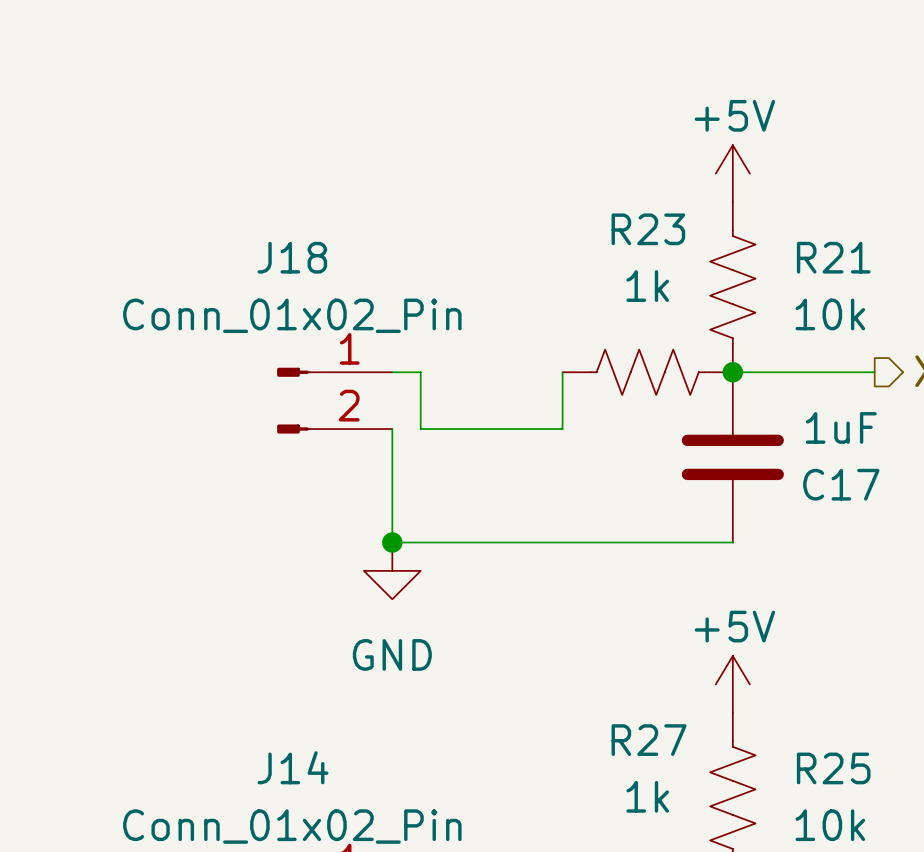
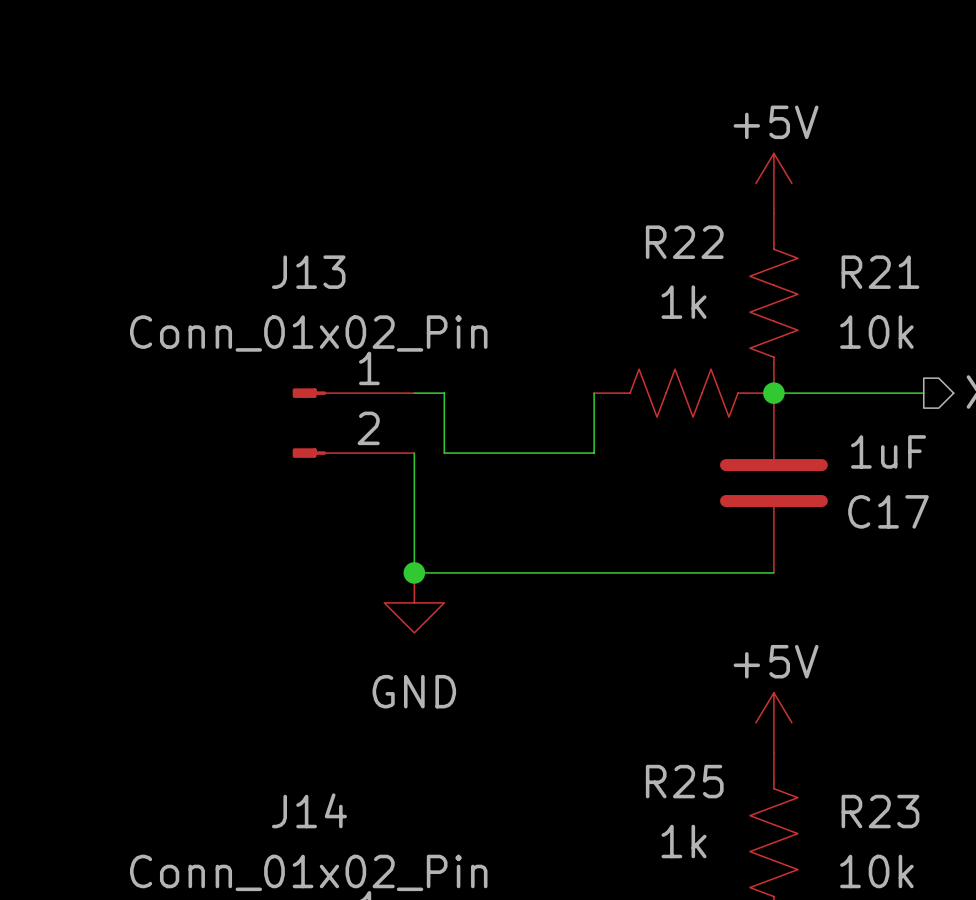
R23 name: R23 (648, 229) -> R22 (684, 242)
J18 name: J18 (292, 257) -> J13 (308, 272)
R27 name: R27 (649, 740) -> R25 (684, 781)
R25 name: R25 (833, 768) -> R23 (880, 811)

